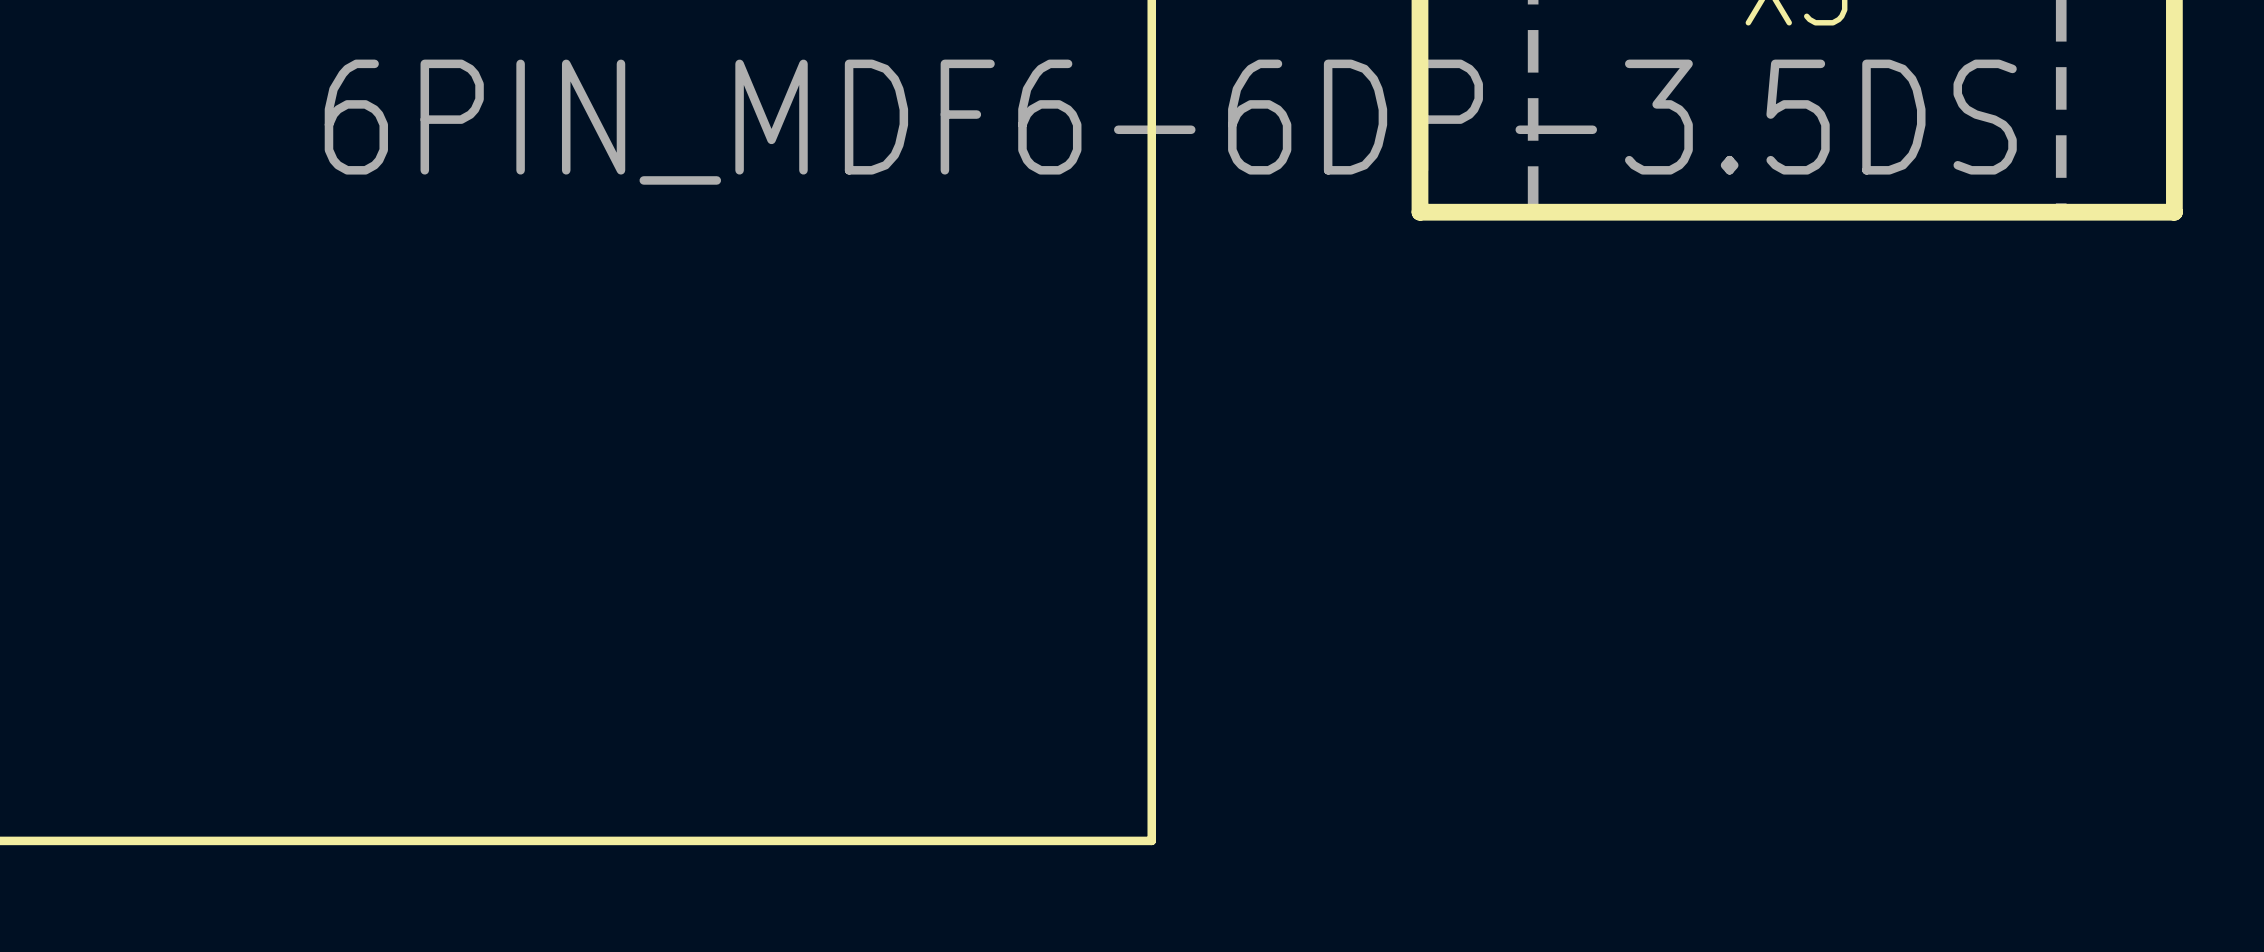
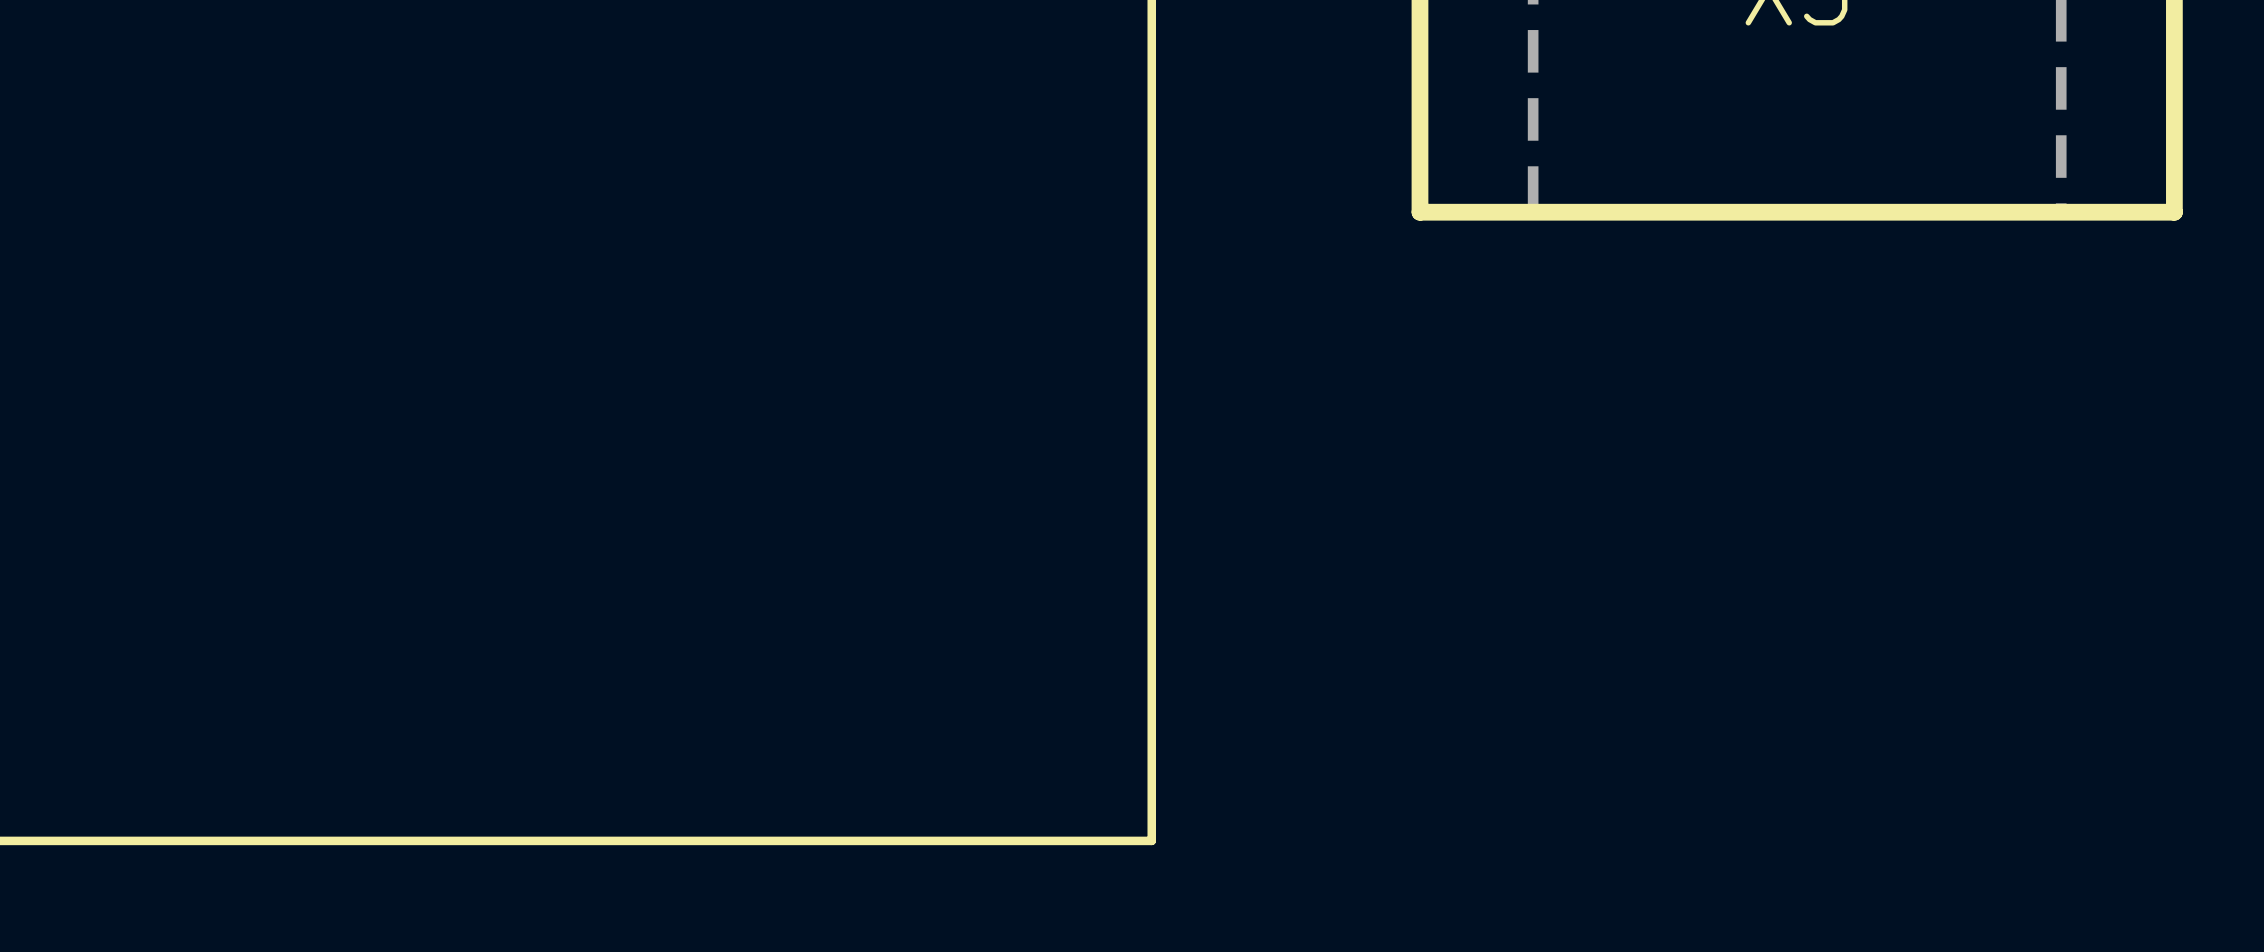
part value: 6PIN_MDF6-6DP-3.5DS (1170, 122) -> none

